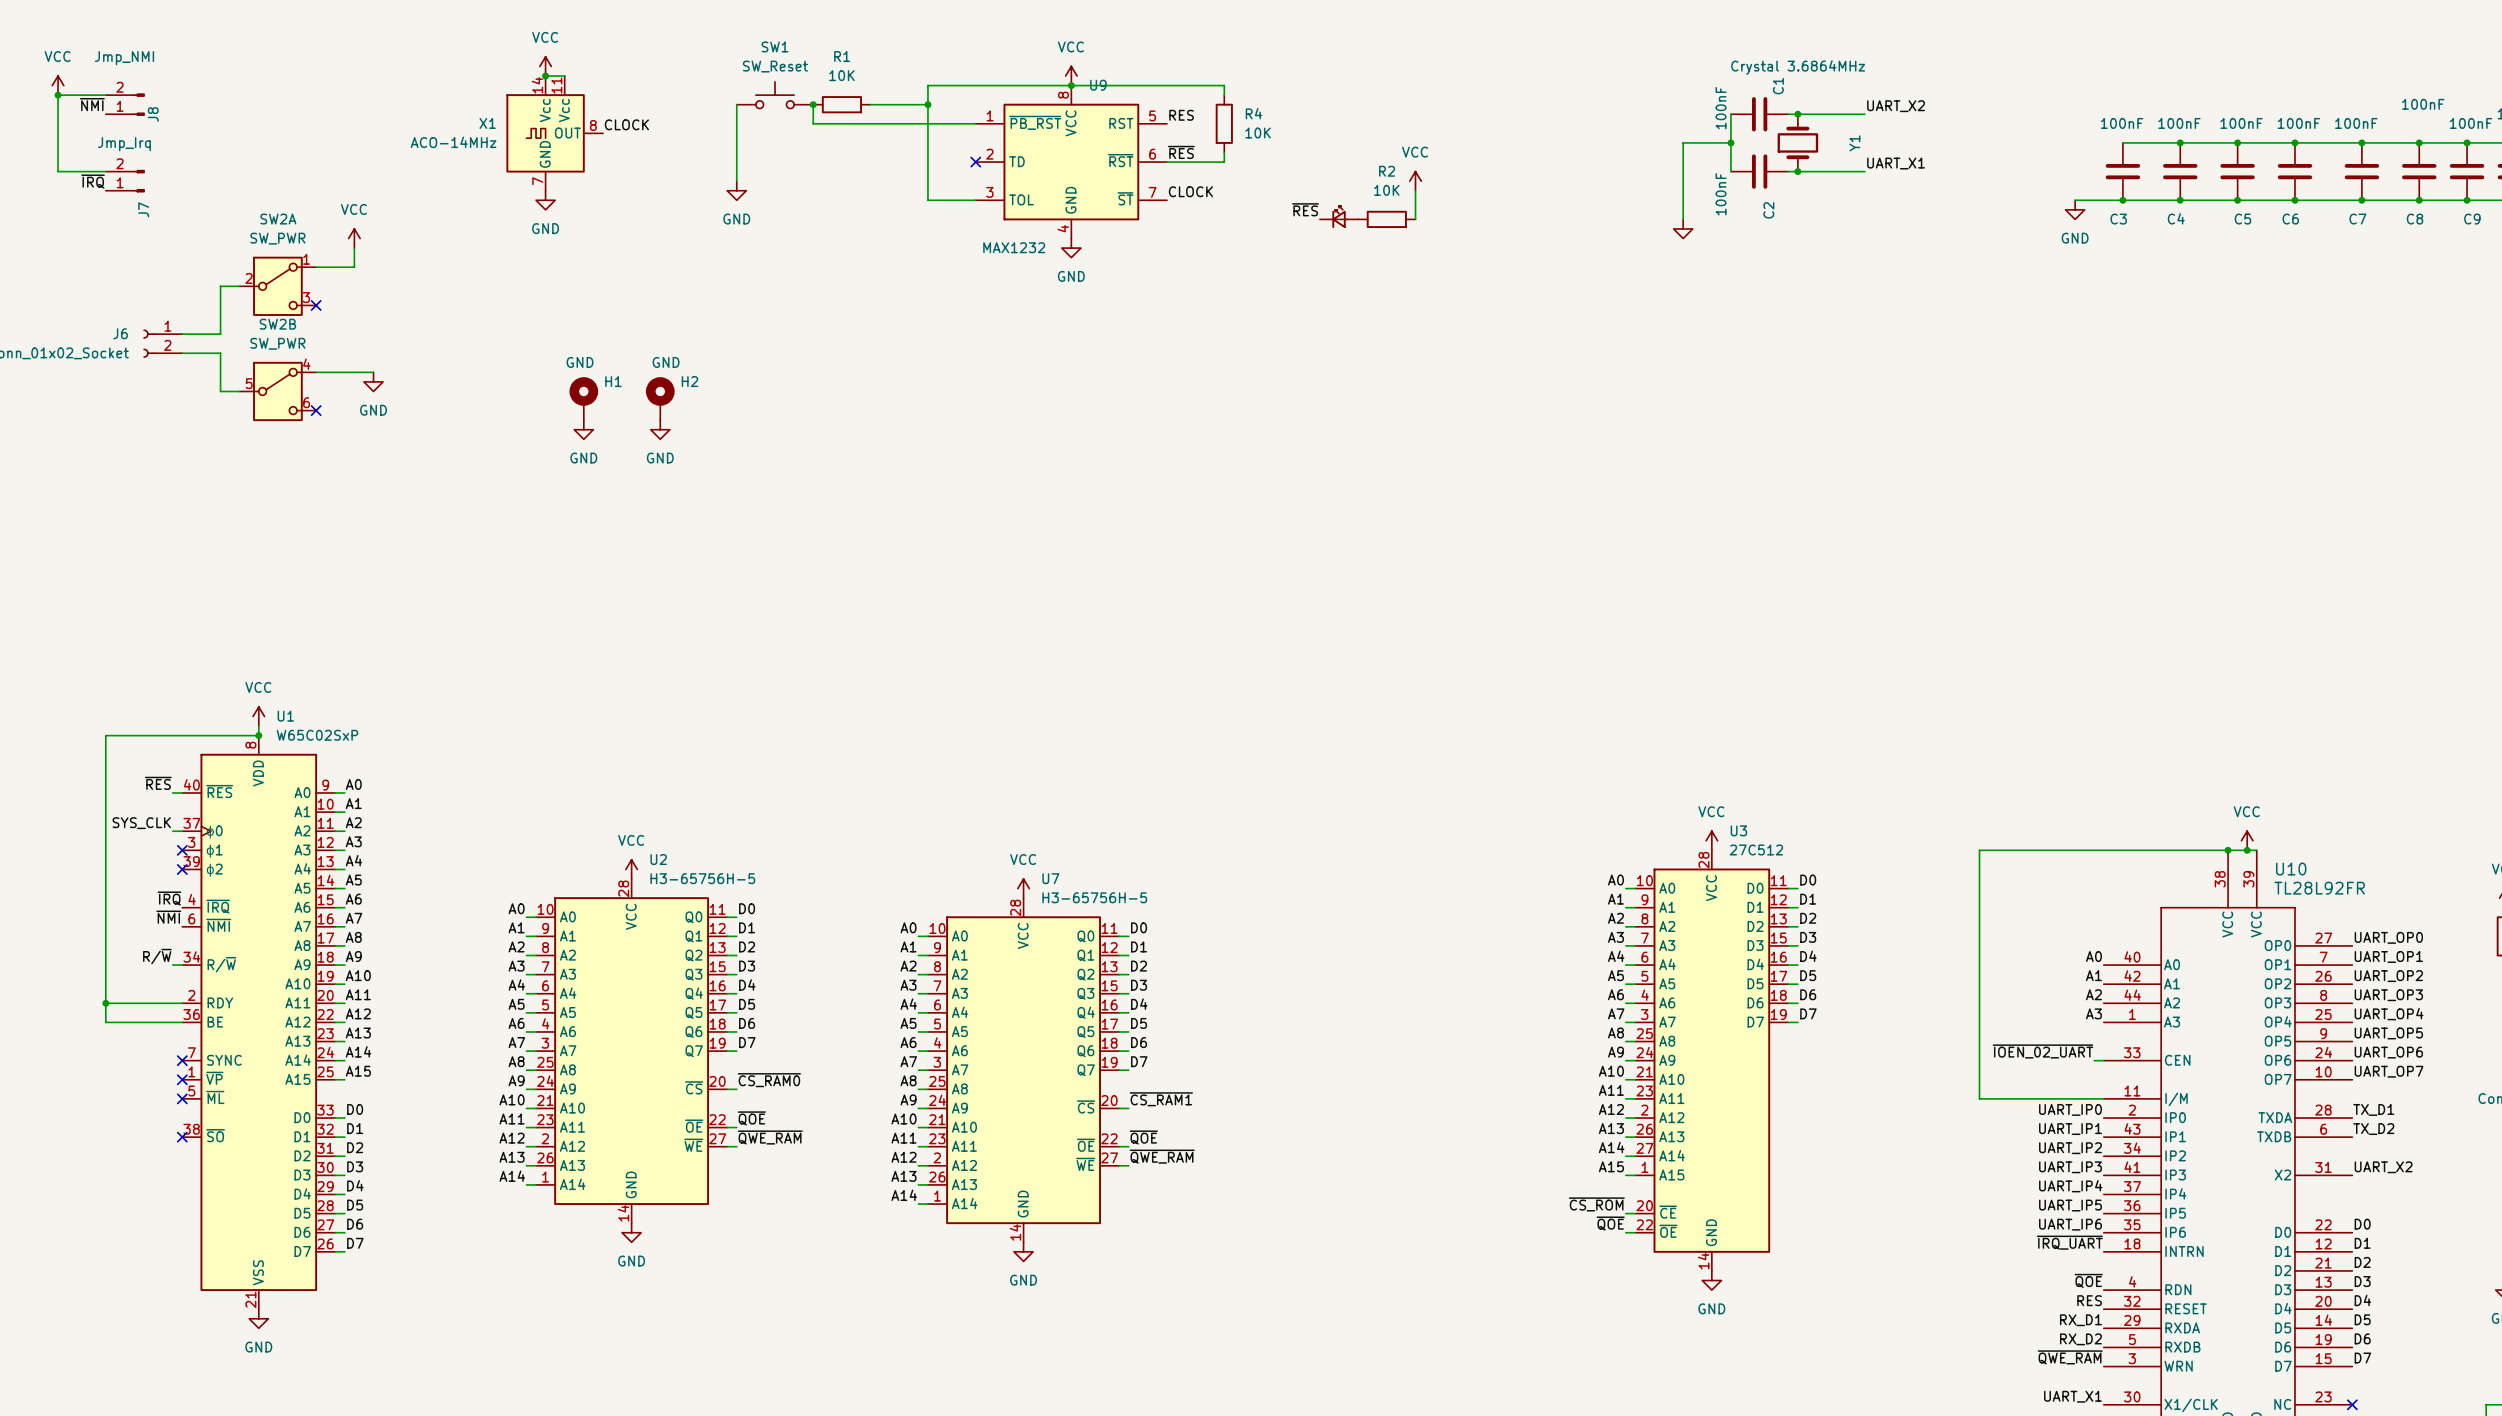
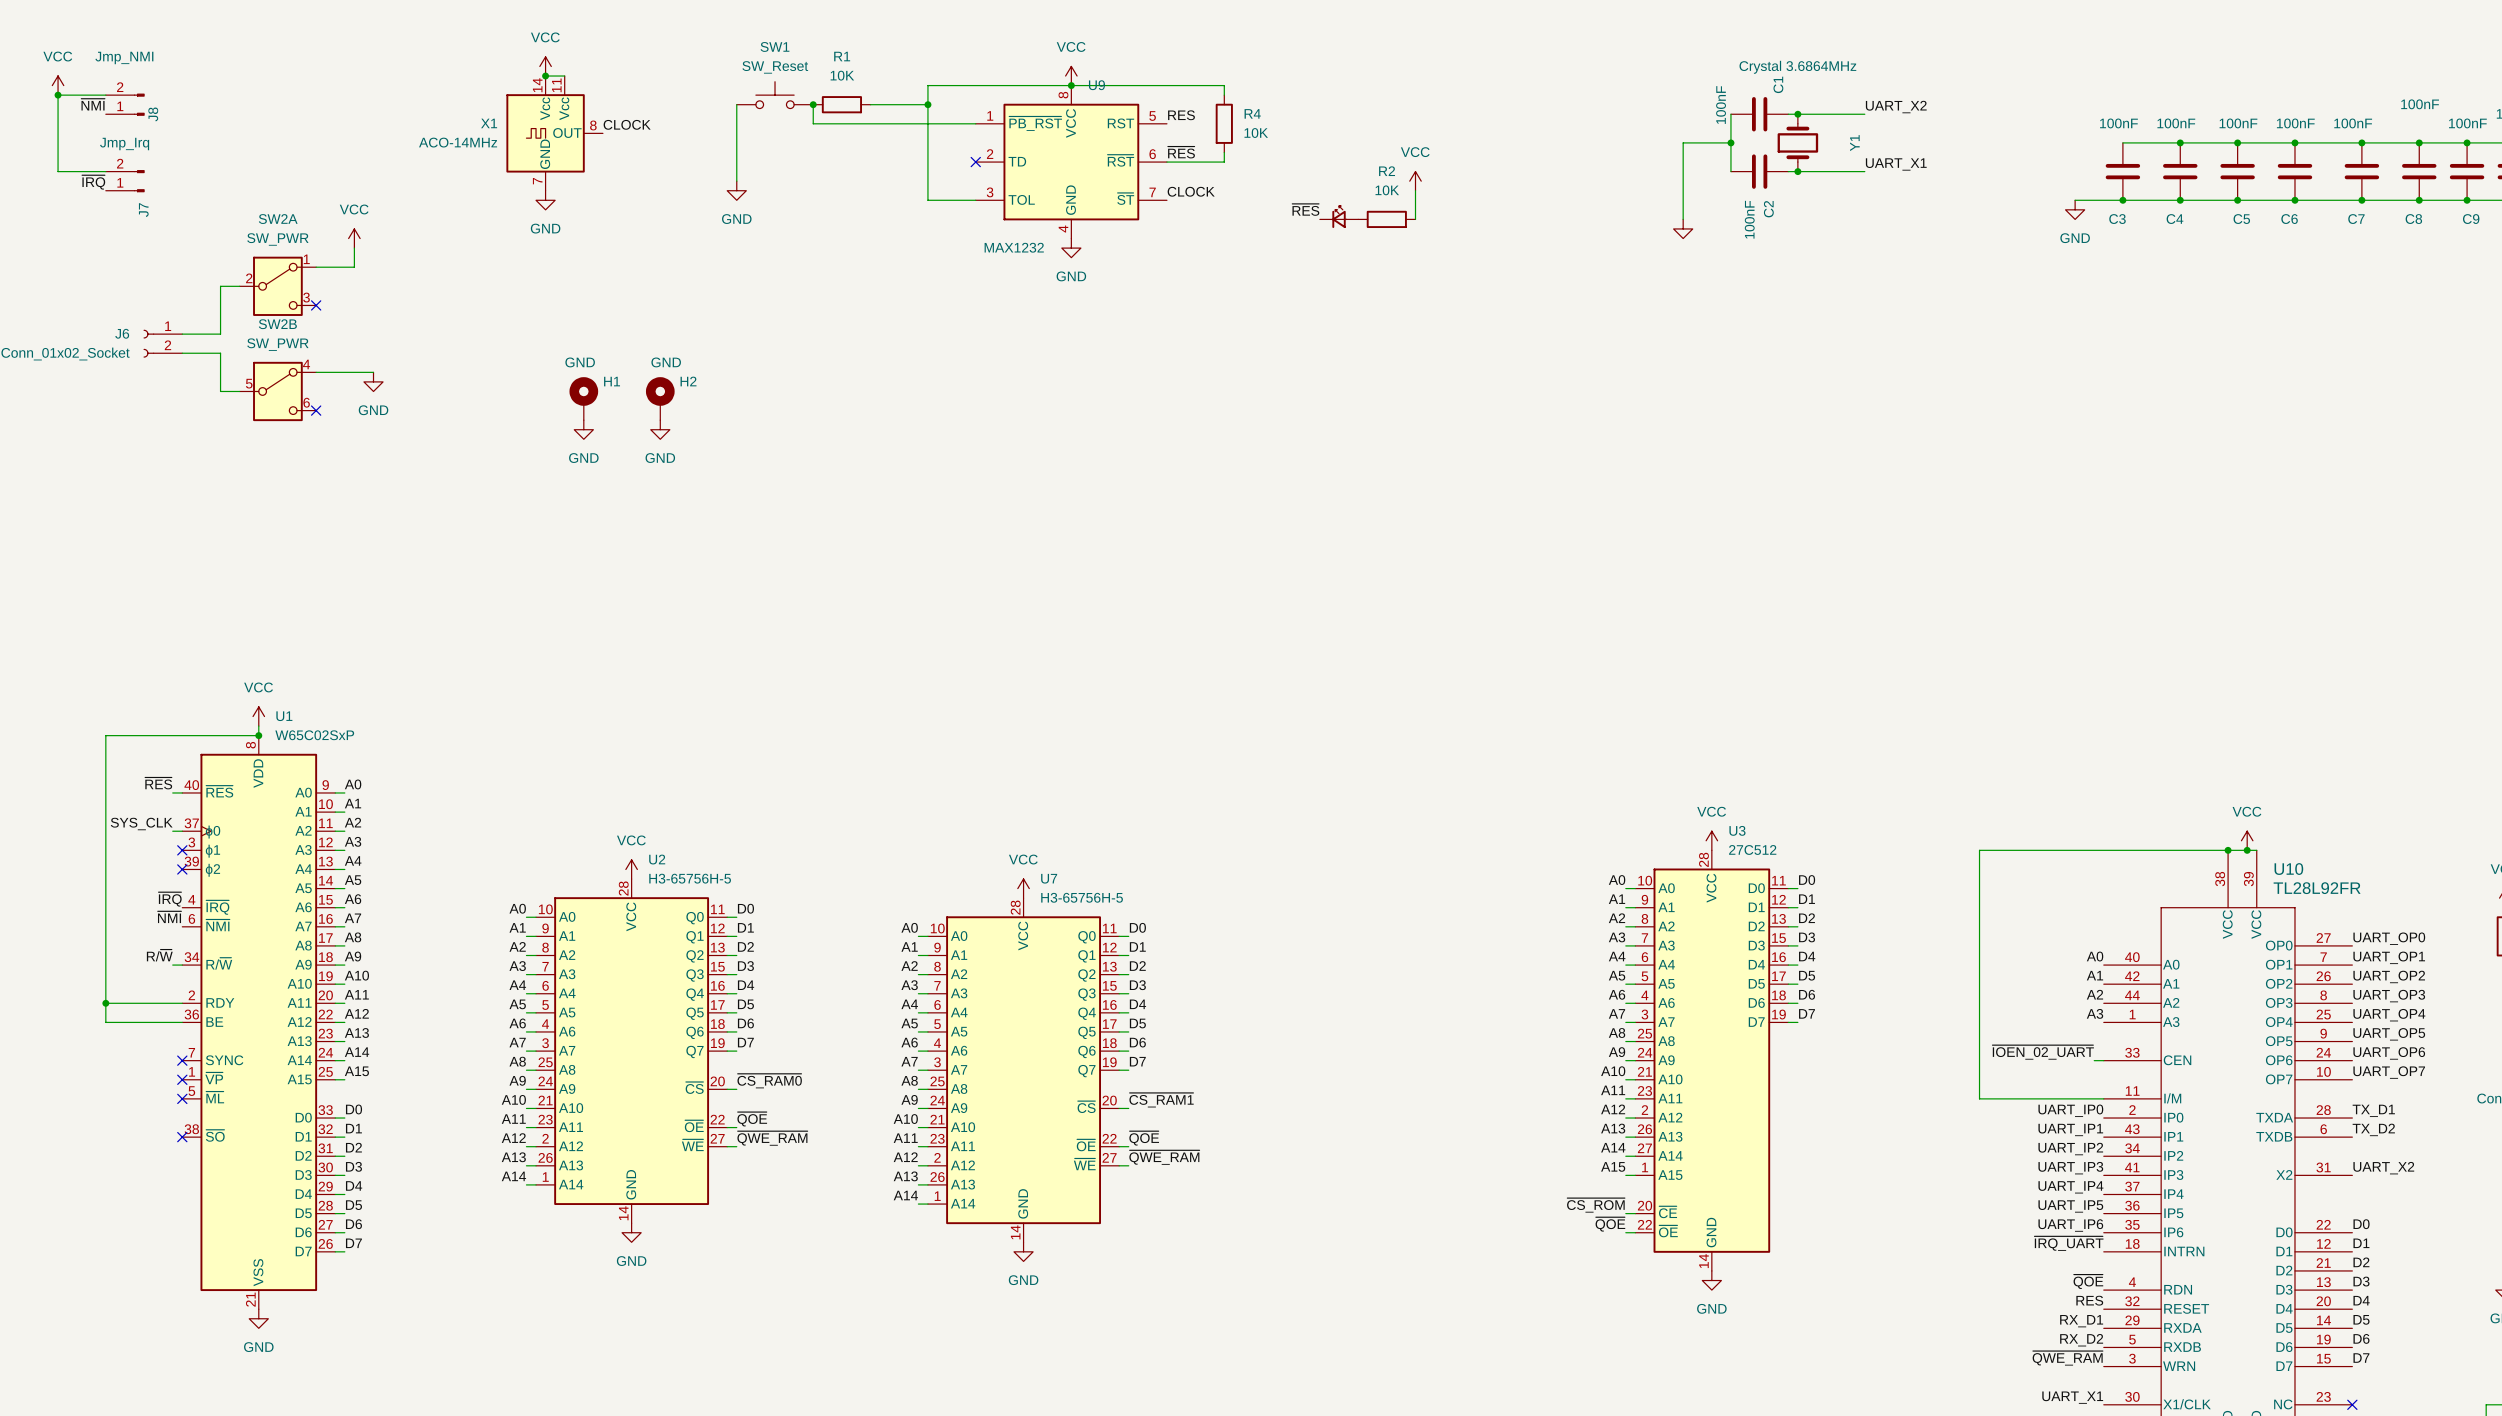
C2 value position: 100nF (1721, 194) -> 100nF (1749, 219)

